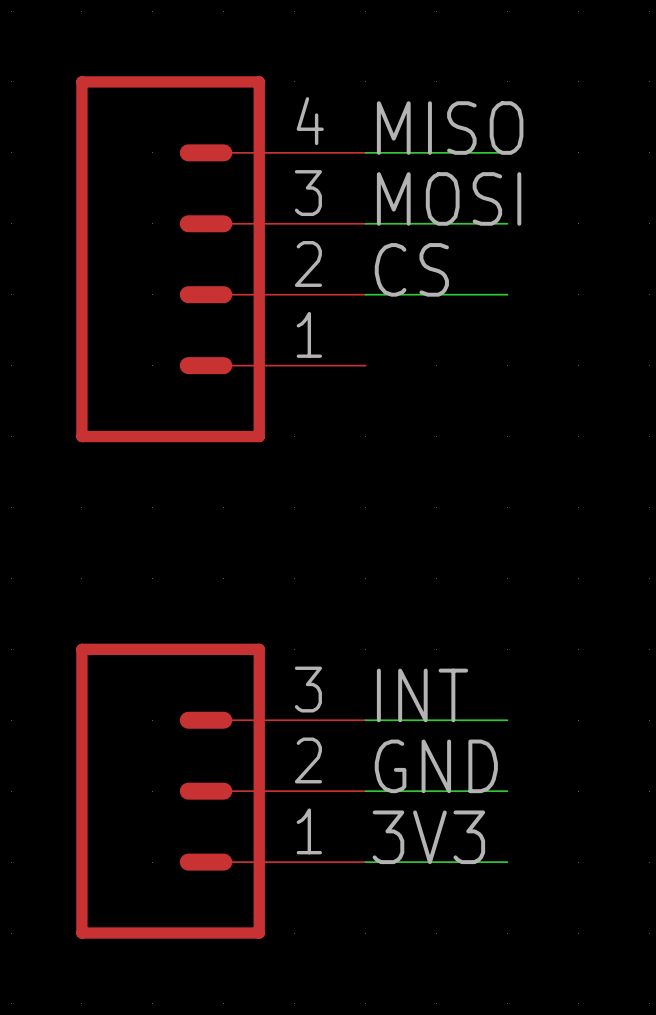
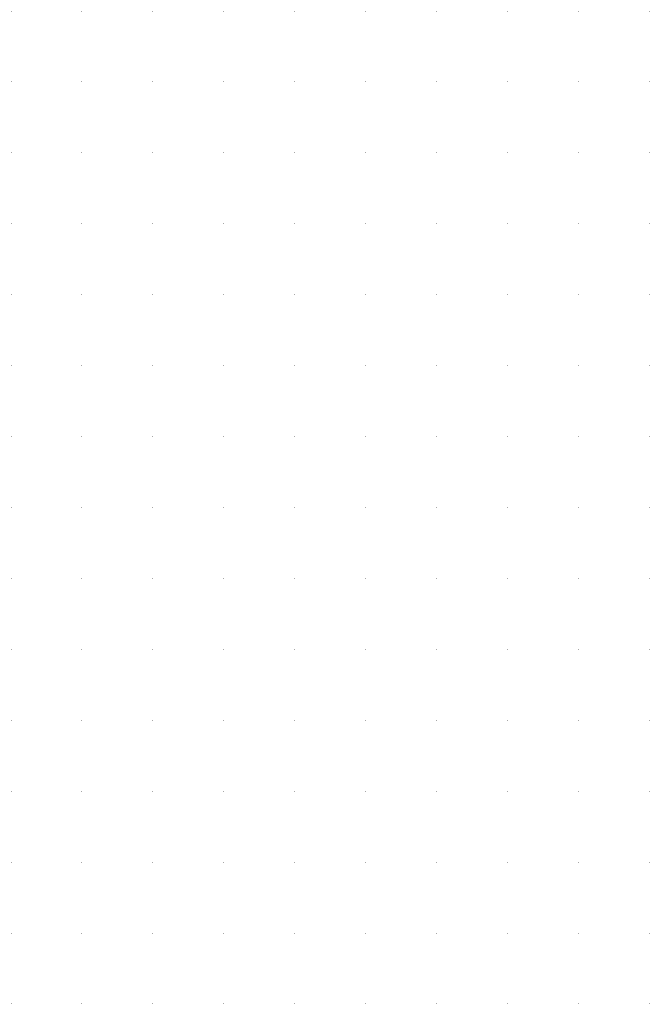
label: MISO (450, 128) -> none
wire: (365, 152) (507, 152) -> none
label: MOSI (449, 198) -> none
wire: (365, 223) (507, 223) -> none
part: (220, 259) -> none
label: CS (411, 269) -> none
wire: (365, 294) (507, 294) -> none
label: INT (422, 695) -> none
wire: (365, 720) (507, 720) -> none
label: GND (436, 766) -> none
part: (220, 791) -> none
wire: (365, 791) (507, 791) -> none
label: 3V3 (428, 837) -> none
wire: (365, 862) (507, 862) -> none

